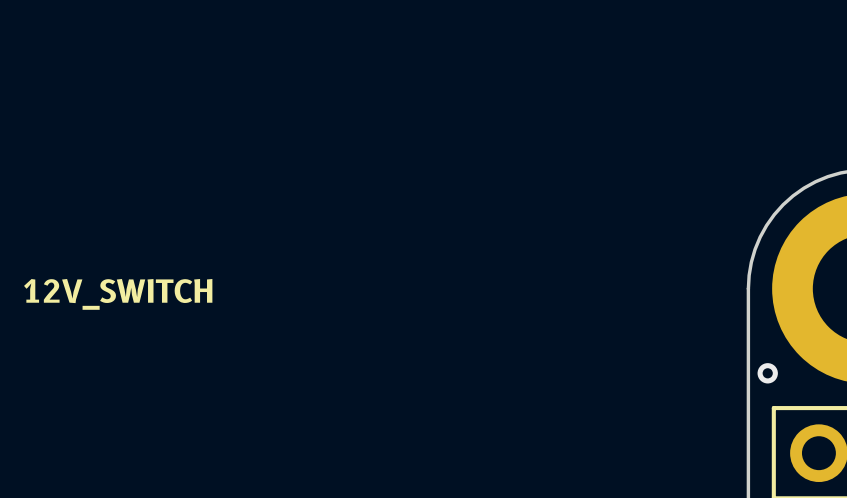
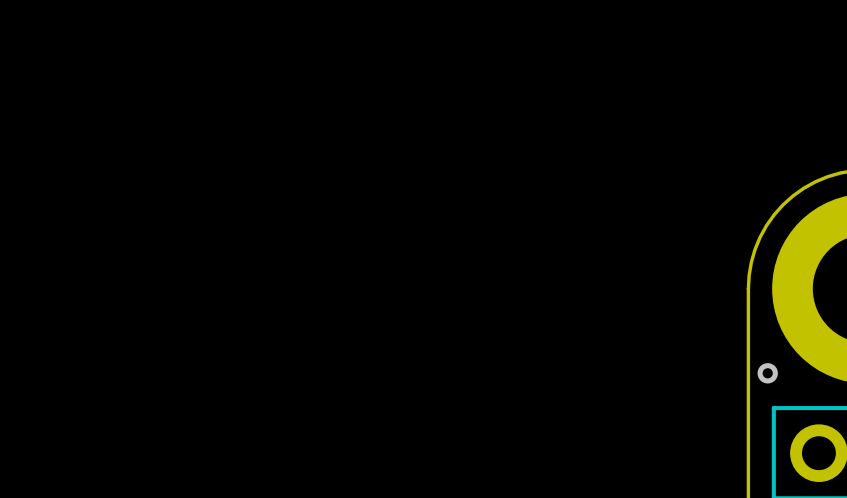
text: 12V_SWITCH (118, 294) -> none

